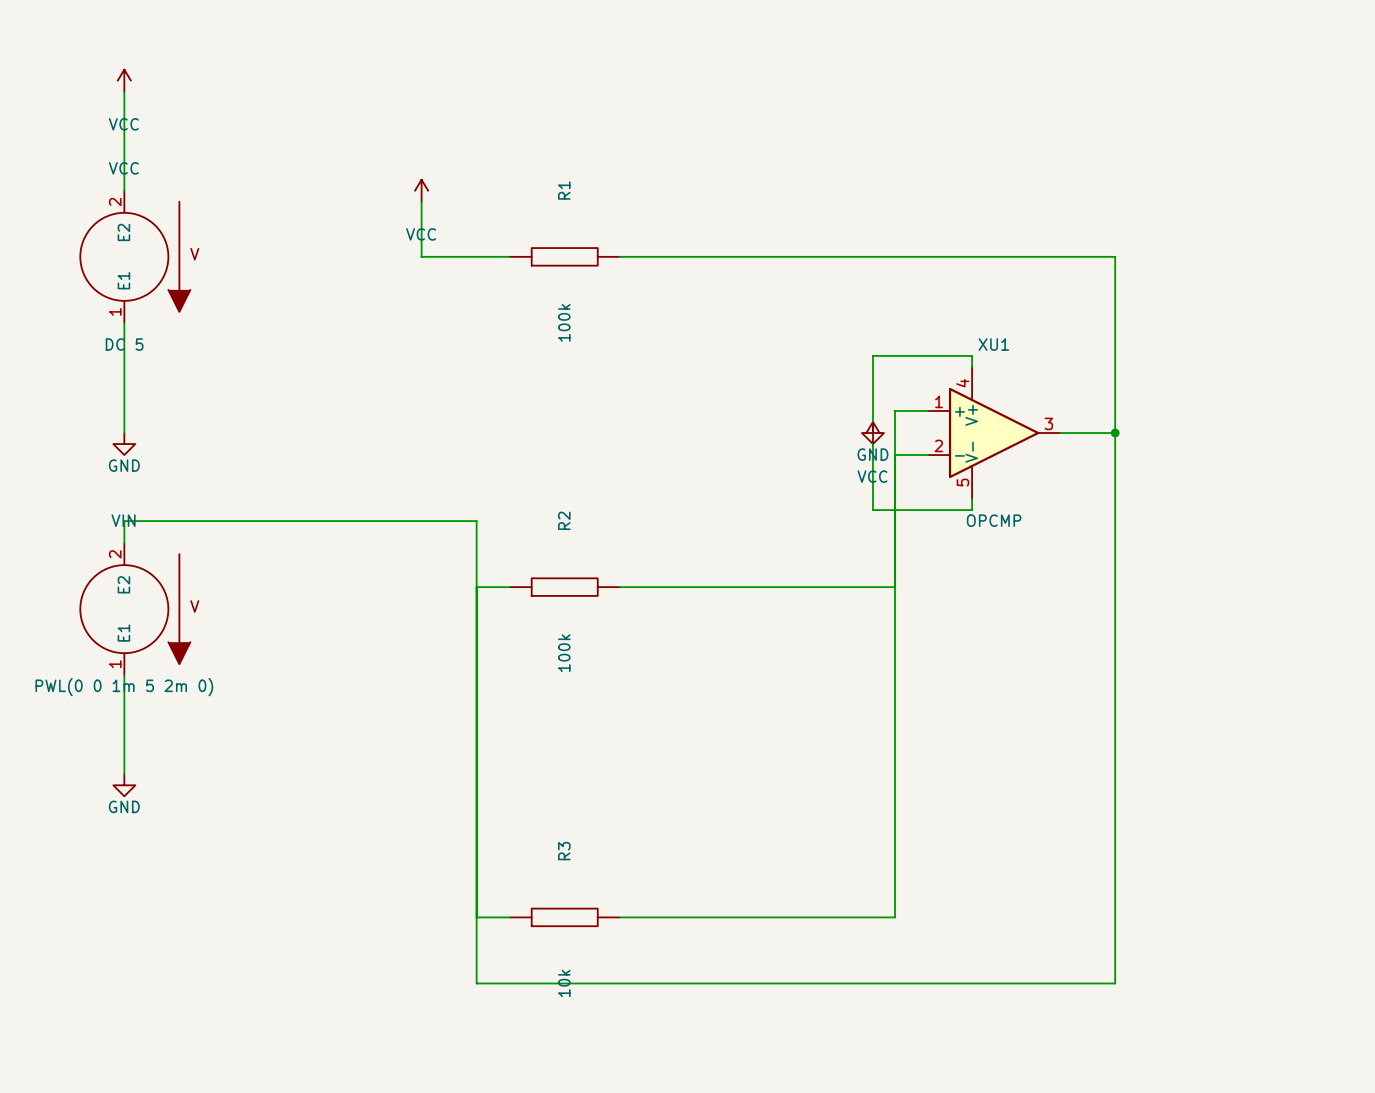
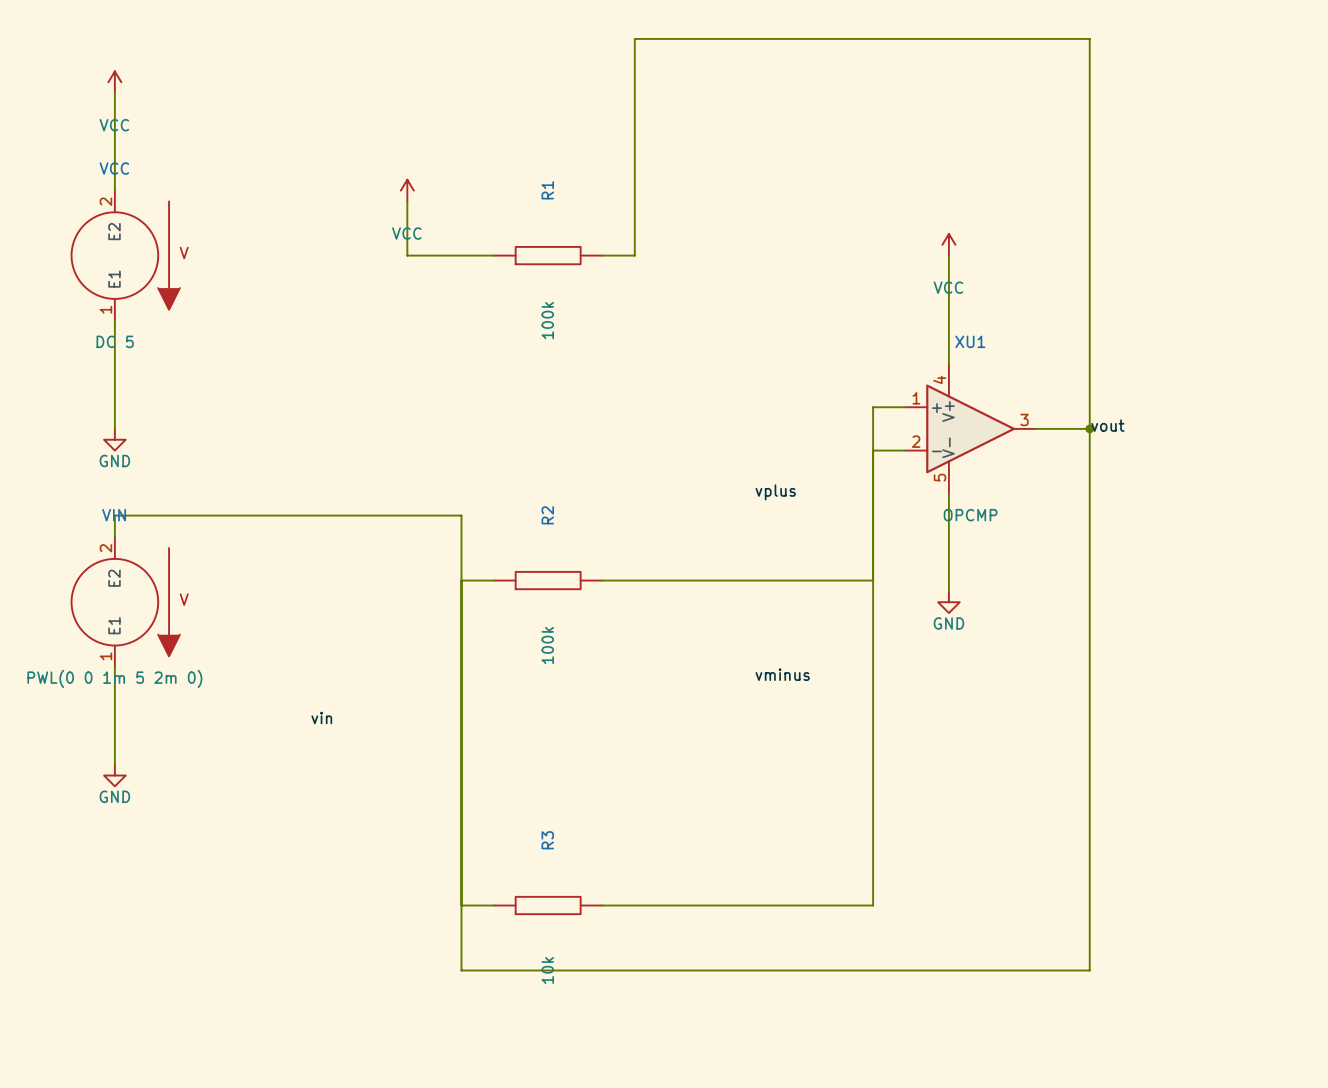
wire: (652, 256) (1115, 256) -> (634, 255) (634, 38) (1089, 38) (1089, 255)
wire: (972, 355) (872, 355) (872, 421) -> (948, 353) (948, 255)
label: none -> vout (1107, 425)
power symbol position: VCC (872, 433) -> VCC (948, 244)
power symbol position: GND (872, 433) -> GND (948, 602)
wire: (872, 444) (872, 510) (972, 510) -> (948, 591) (948, 504)
label: none -> vplus (775, 492)
label: none -> vminus (782, 674)
label: none -> vin (321, 718)

